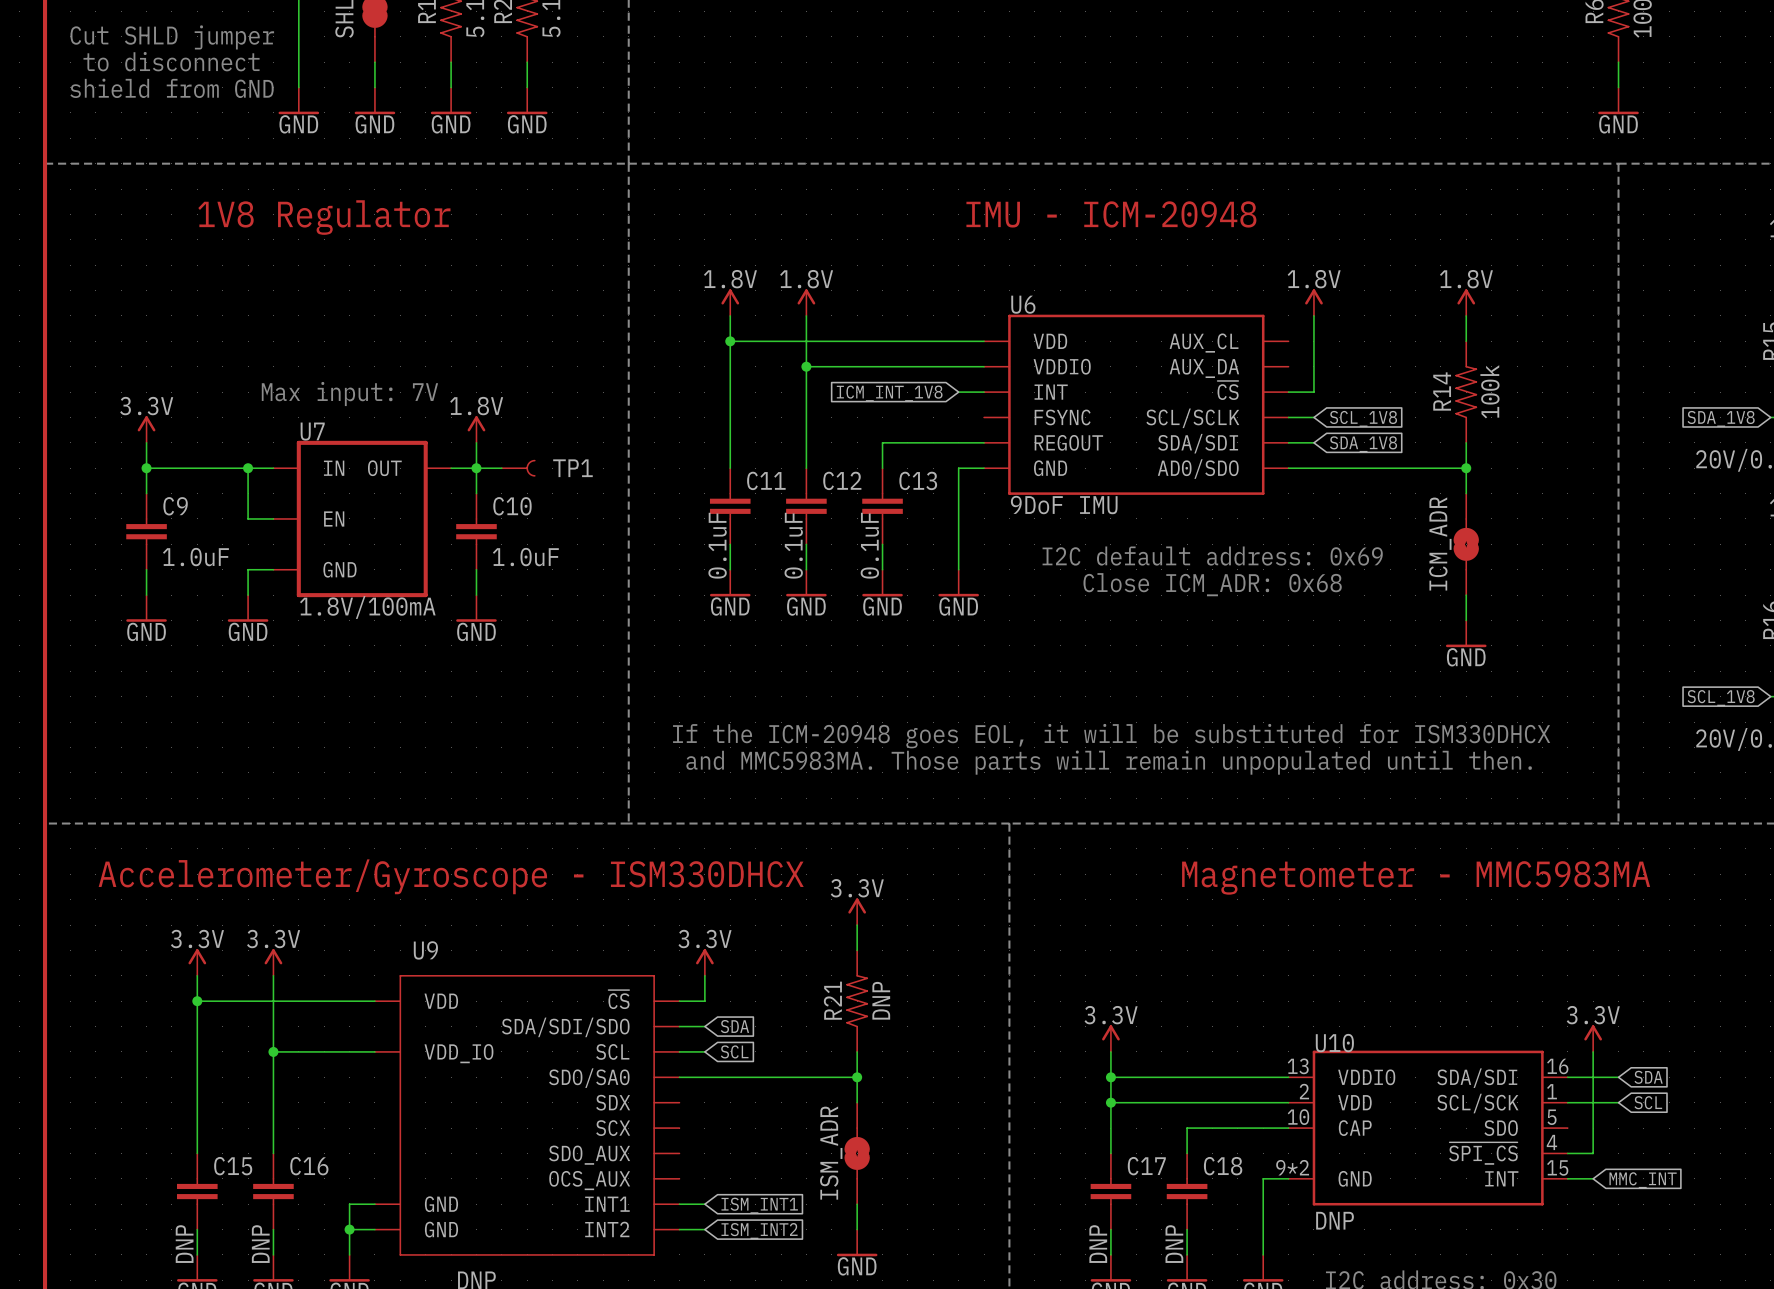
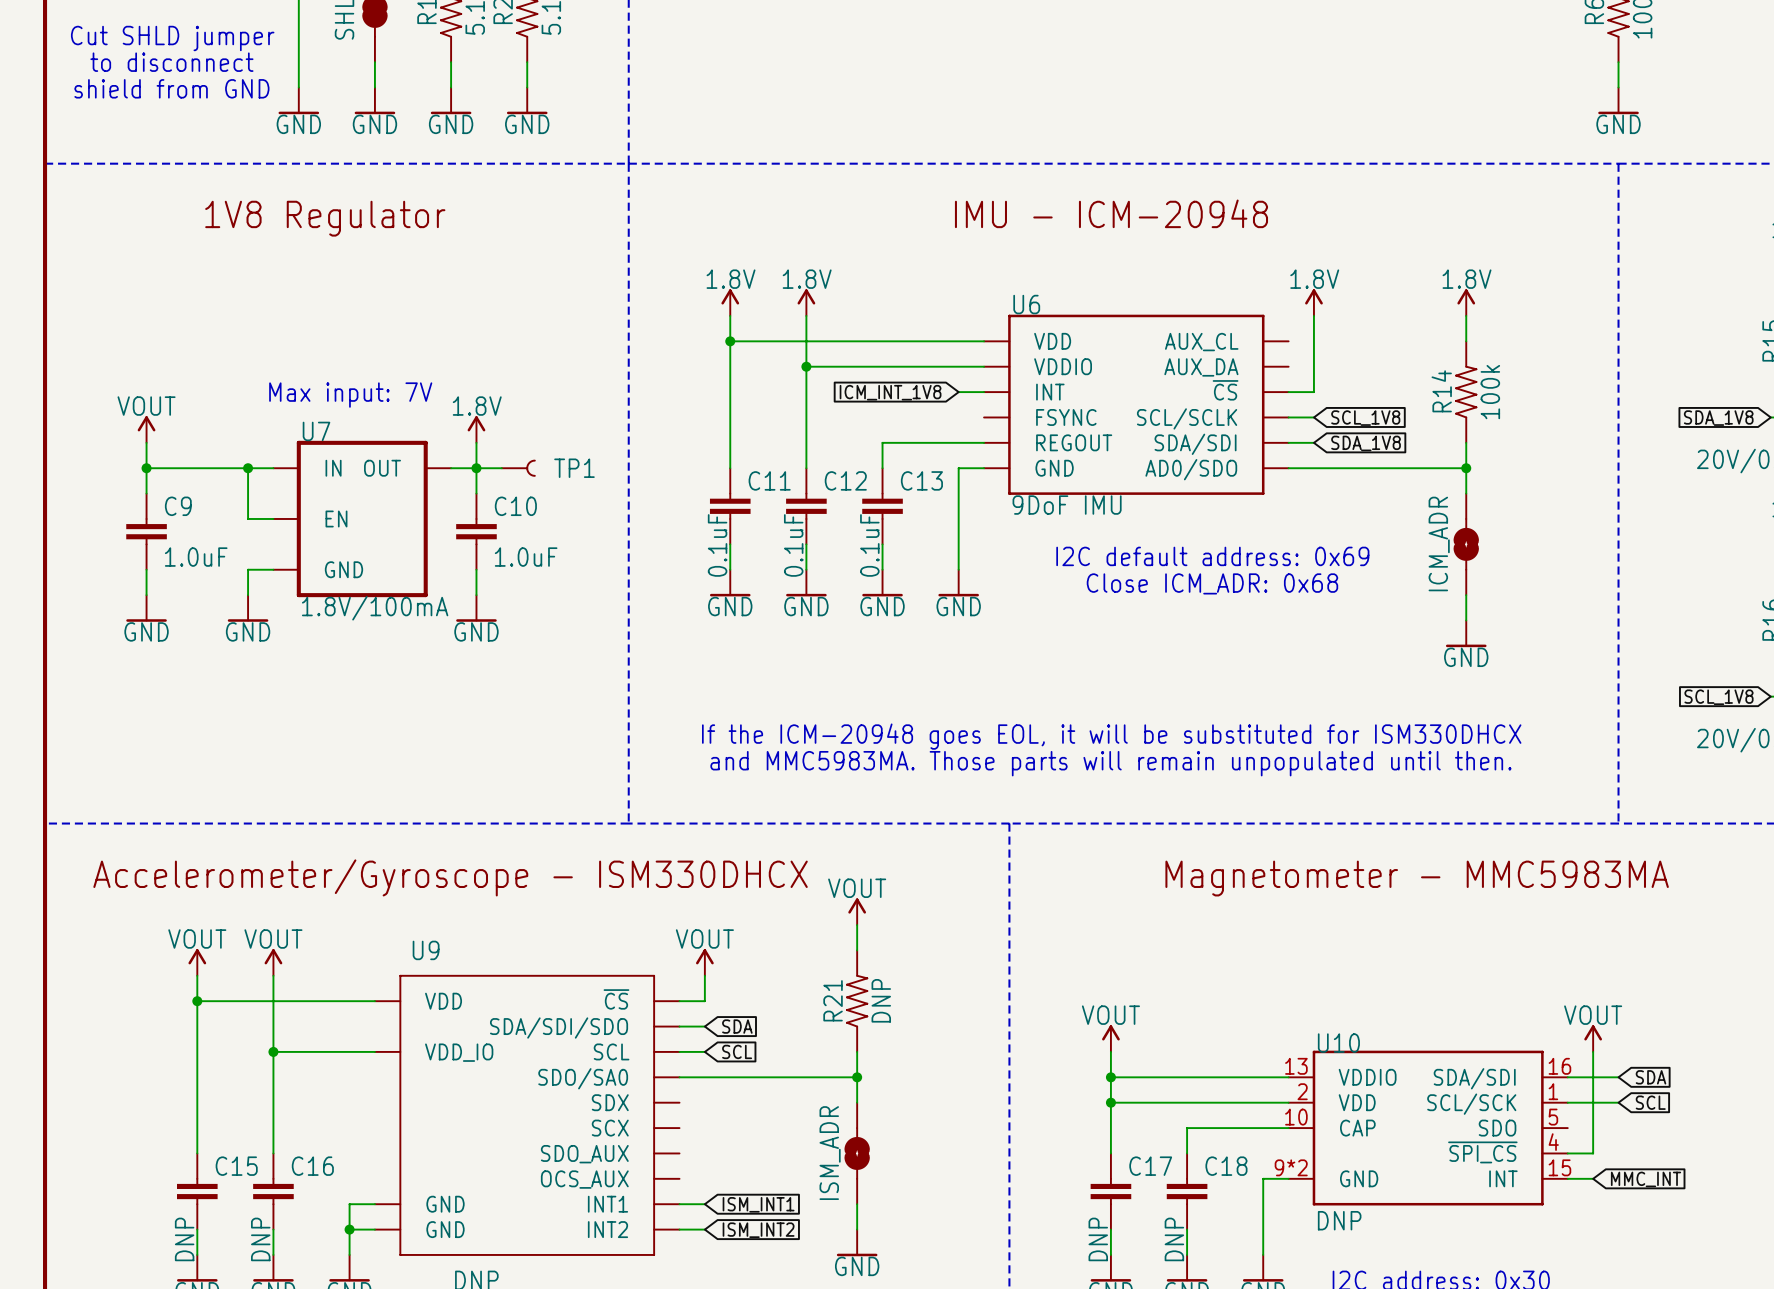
power symbol: 3.3V (146, 429) -> VOUT (146, 429)
power symbol: 3.3V (857, 911) -> VOUT (857, 911)
power symbol: 3.3V (197, 962) -> VOUT (197, 962)
power symbol: 3.3V (273, 962) -> VOUT (273, 962)
power symbol: 3.3V (704, 962) -> VOUT (704, 962)
power symbol: 3.3V (1110, 1038) -> VOUT (1110, 1038)
power symbol: 3.3V (1593, 1038) -> VOUT (1593, 1038)

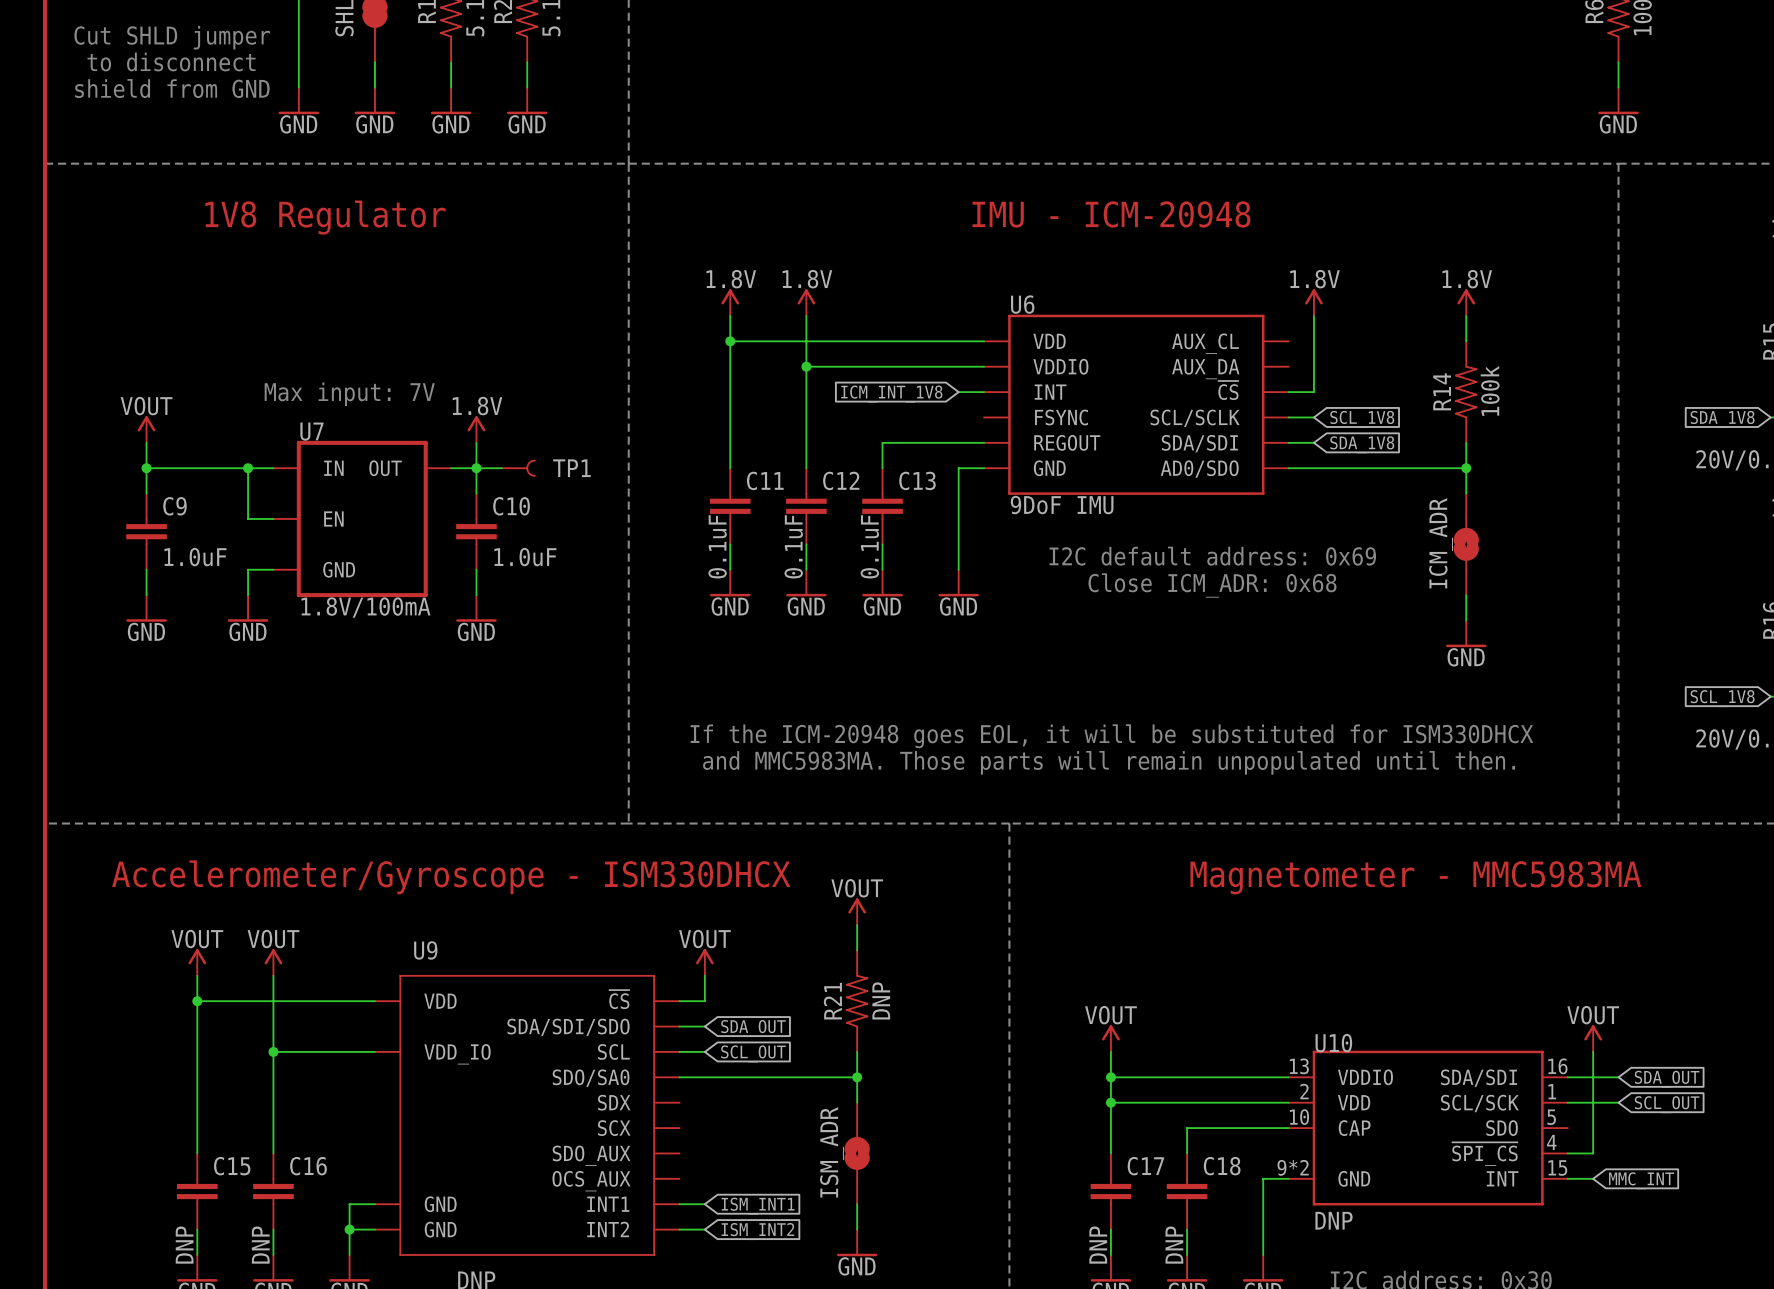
global label: SDA (737, 1026) -> SDA_OUT (753, 1028)
global label: SCL (737, 1051) -> SCL_OUT (753, 1053)
global label: SDA (1651, 1077) -> SDA_OUT (1667, 1079)
global label: SCL (1650, 1102) -> SCL_OUT (1667, 1104)

